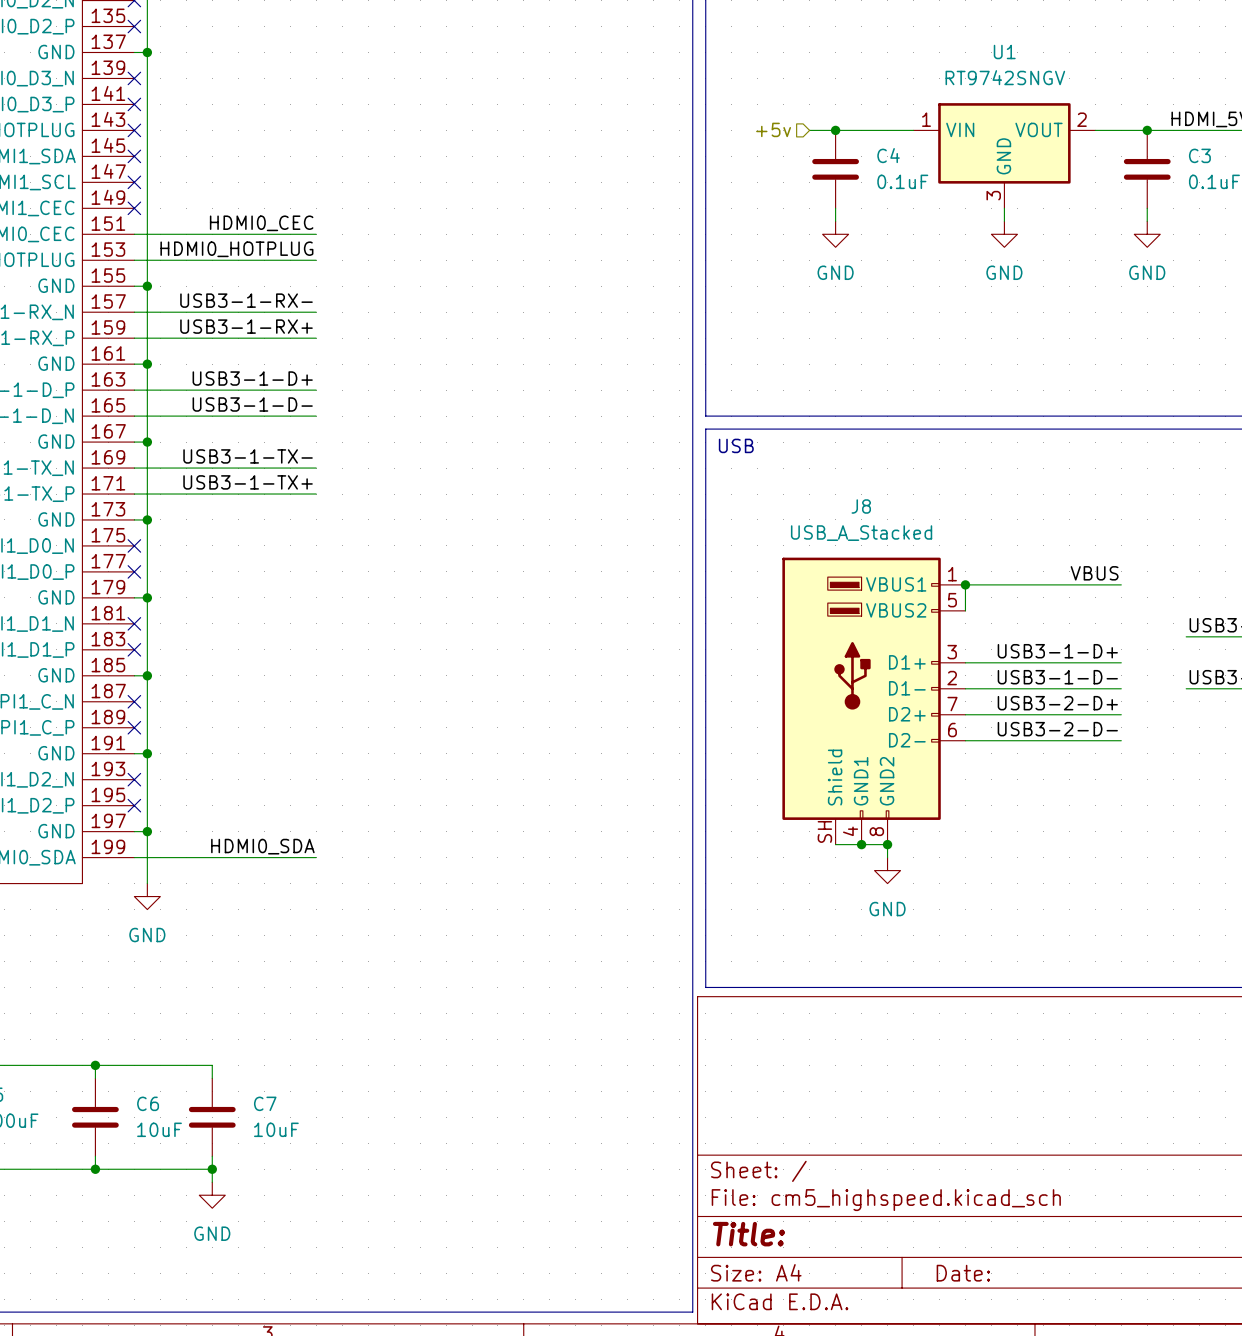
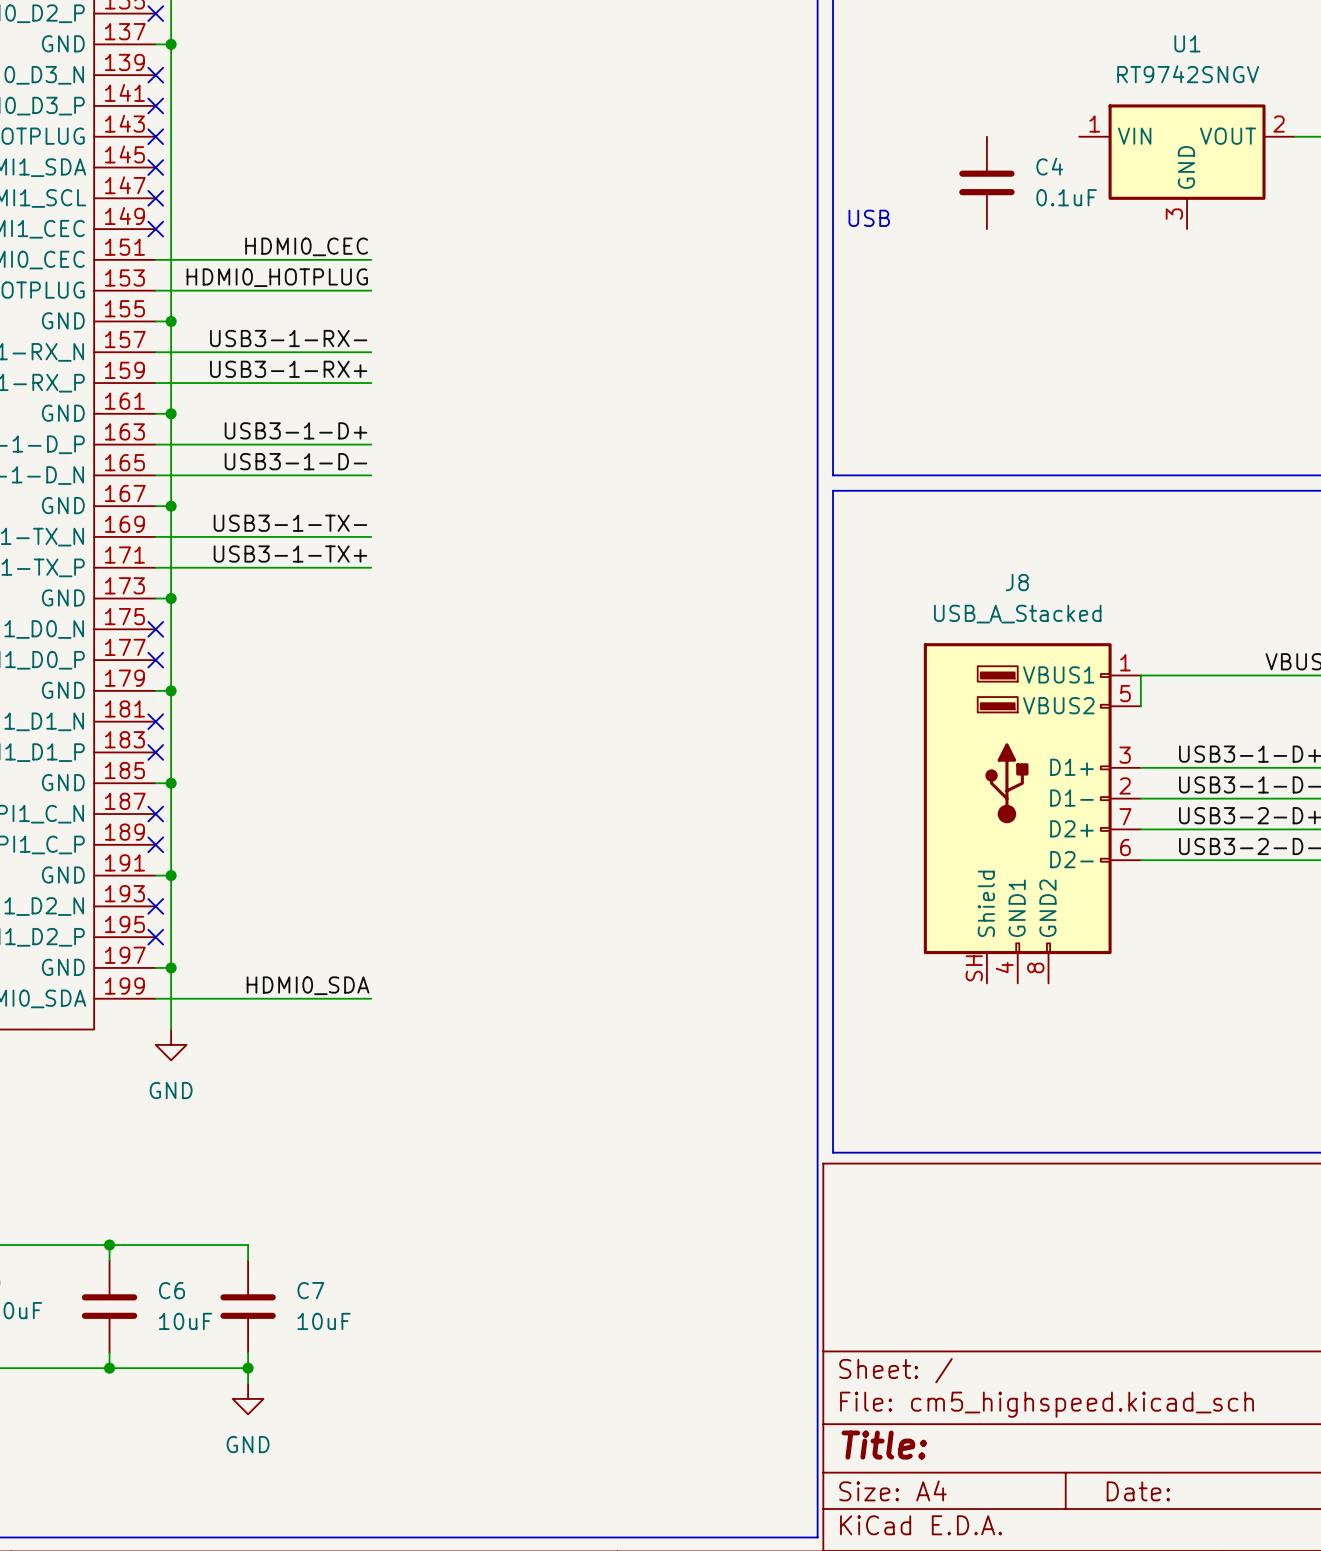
hierarchical label: +5v (773, 129) -> none
wire: (809, 130) (913, 130) -> none
junction: (835, 130) -> none
wire: (835, 208) (835, 221) -> none
wire: (1004, 208) (1004, 221) -> none
power symbol: GND (835, 234) -> none
power symbol: GND (1004, 234) -> none
text position: USB (736, 445) -> USB (869, 218)
junction: (965, 584) -> none
wire: (835, 844) (887, 844) (887, 857) -> none
junction: (861, 844) -> none
junction: (887, 844) -> none
power symbol: GND (887, 870) -> none

